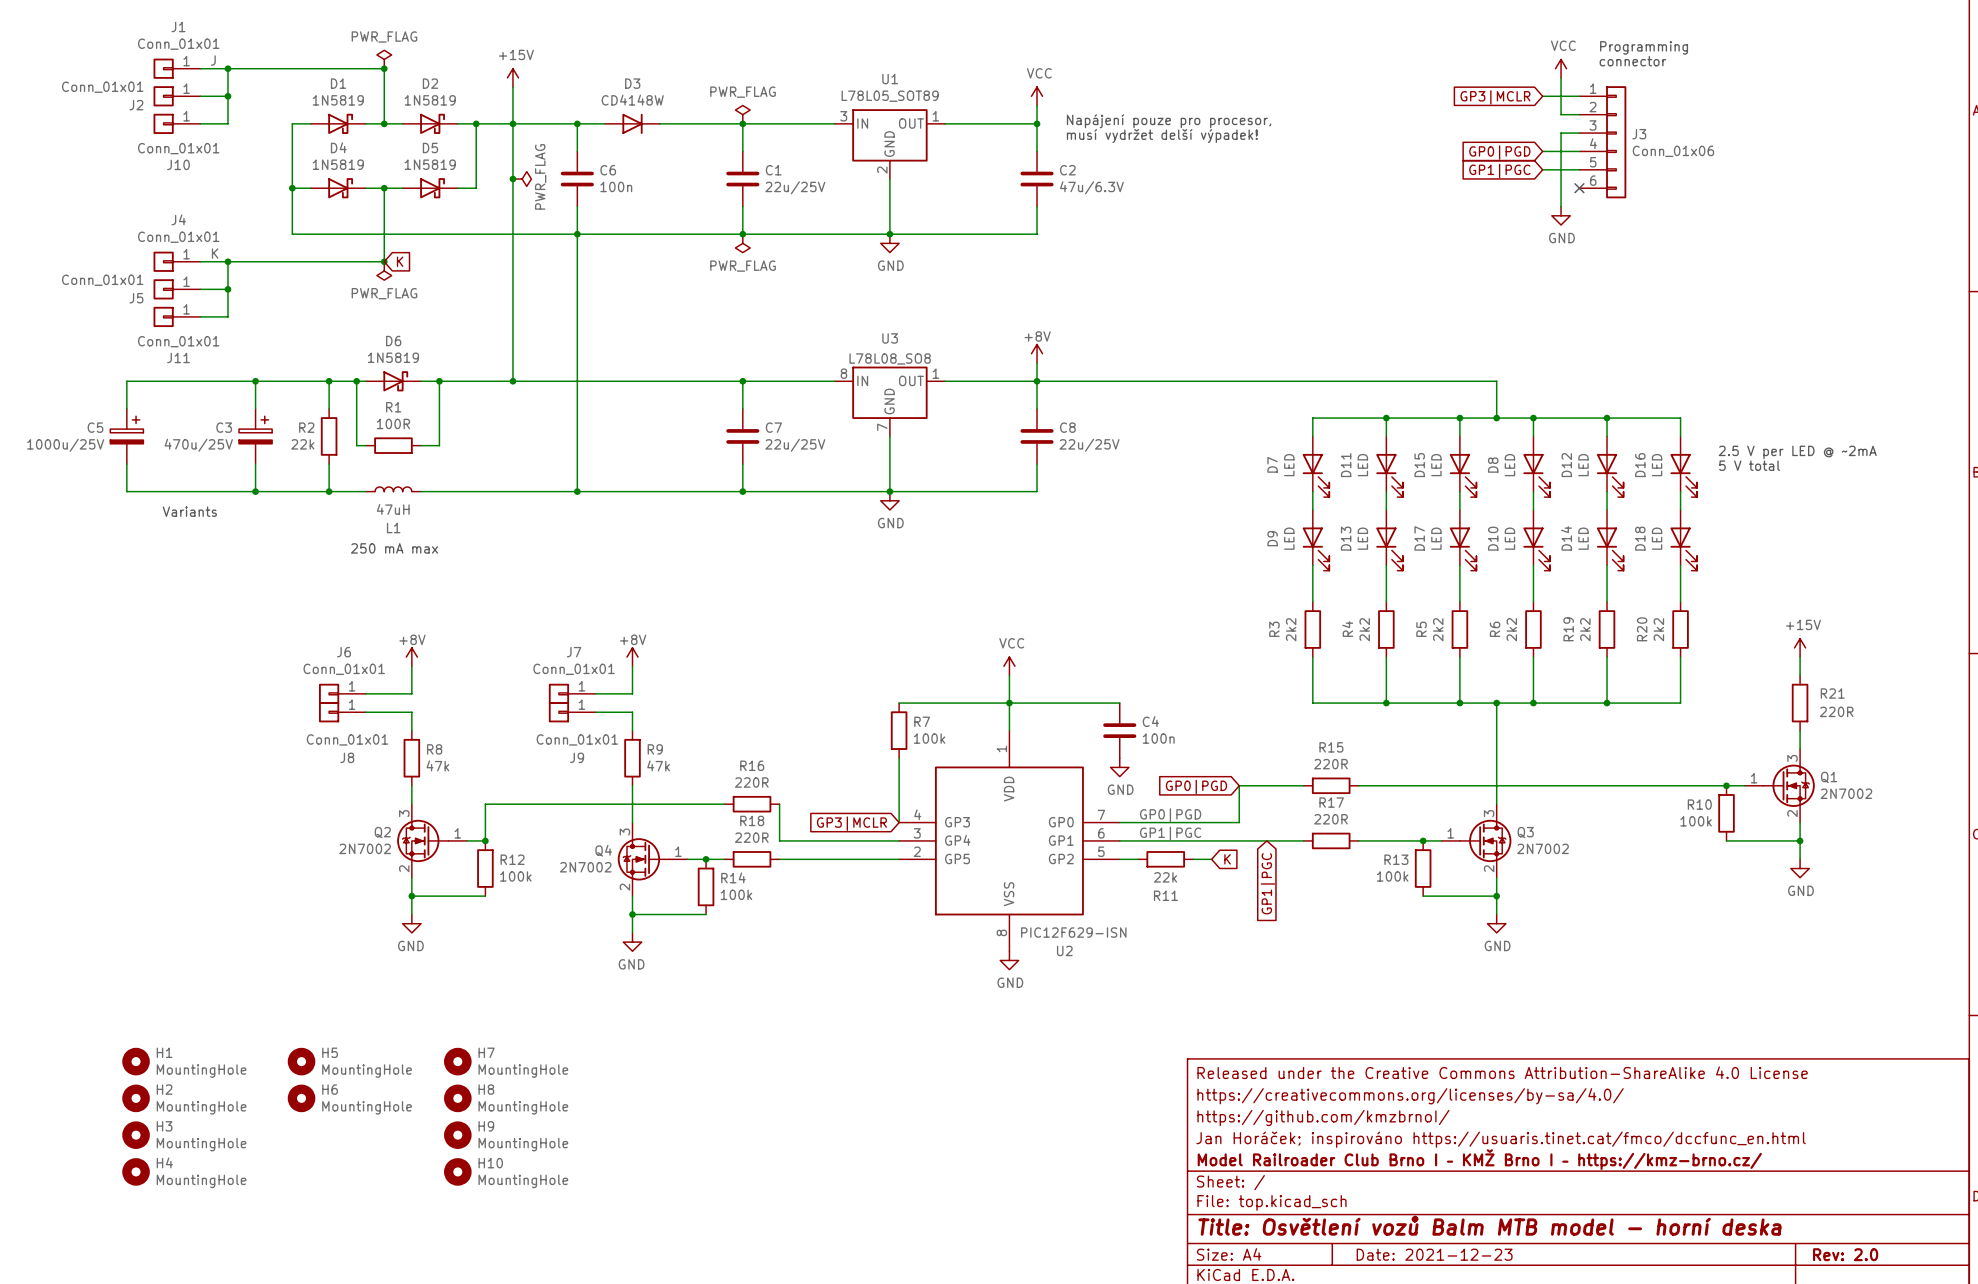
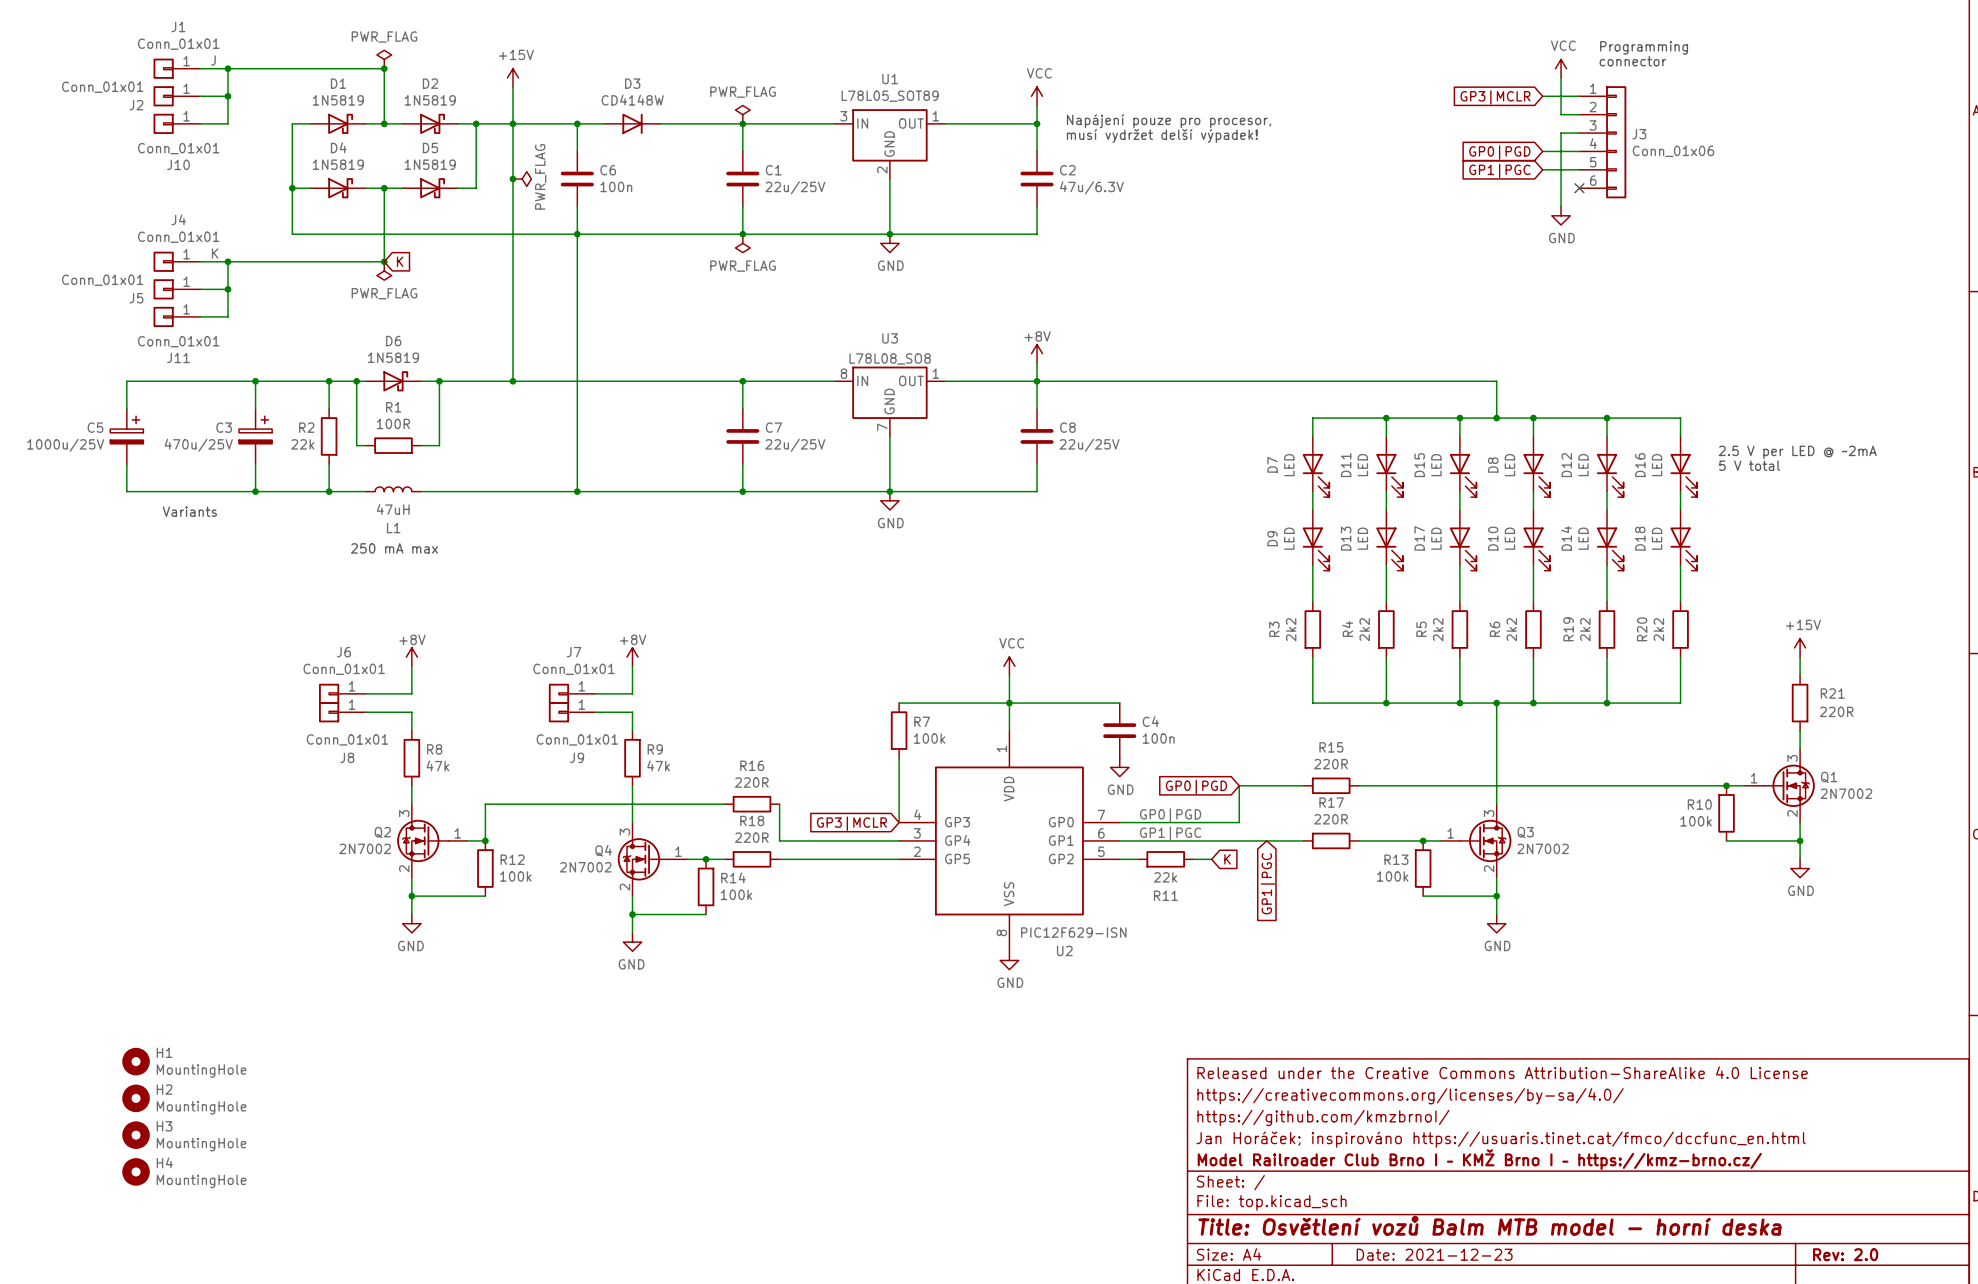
H5: MountingHole (301, 1061) -> none
H7: MountingHole (457, 1061) -> none
H6: MountingHole (301, 1098) -> none
H8: MountingHole (457, 1098) -> none
H9: MountingHole (457, 1135) -> none
H10: MountingHole (457, 1171) -> none

